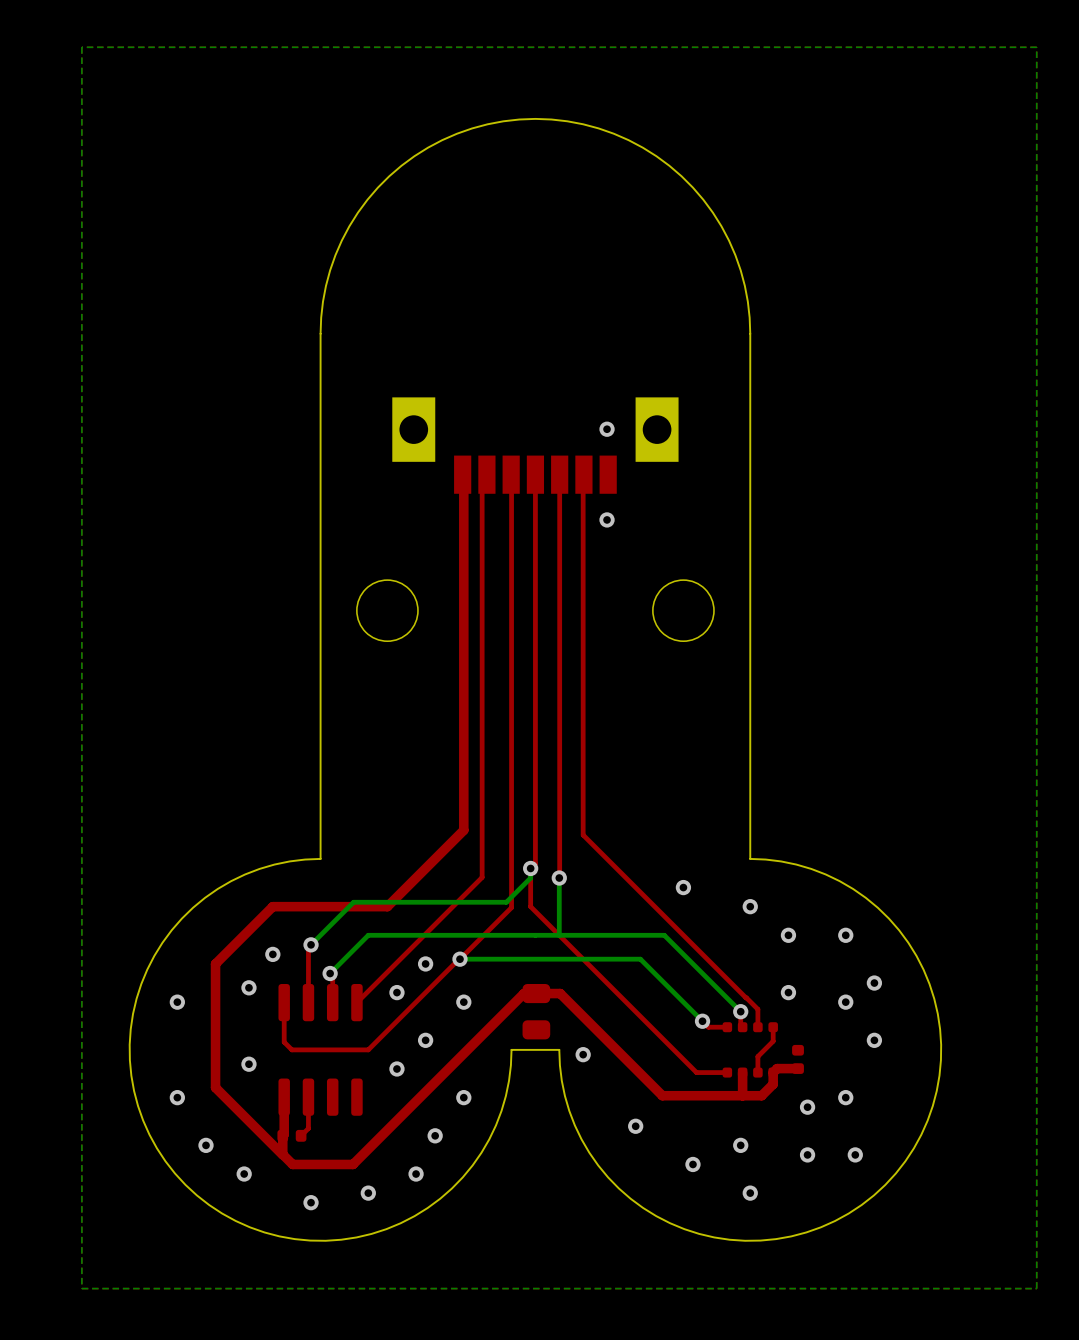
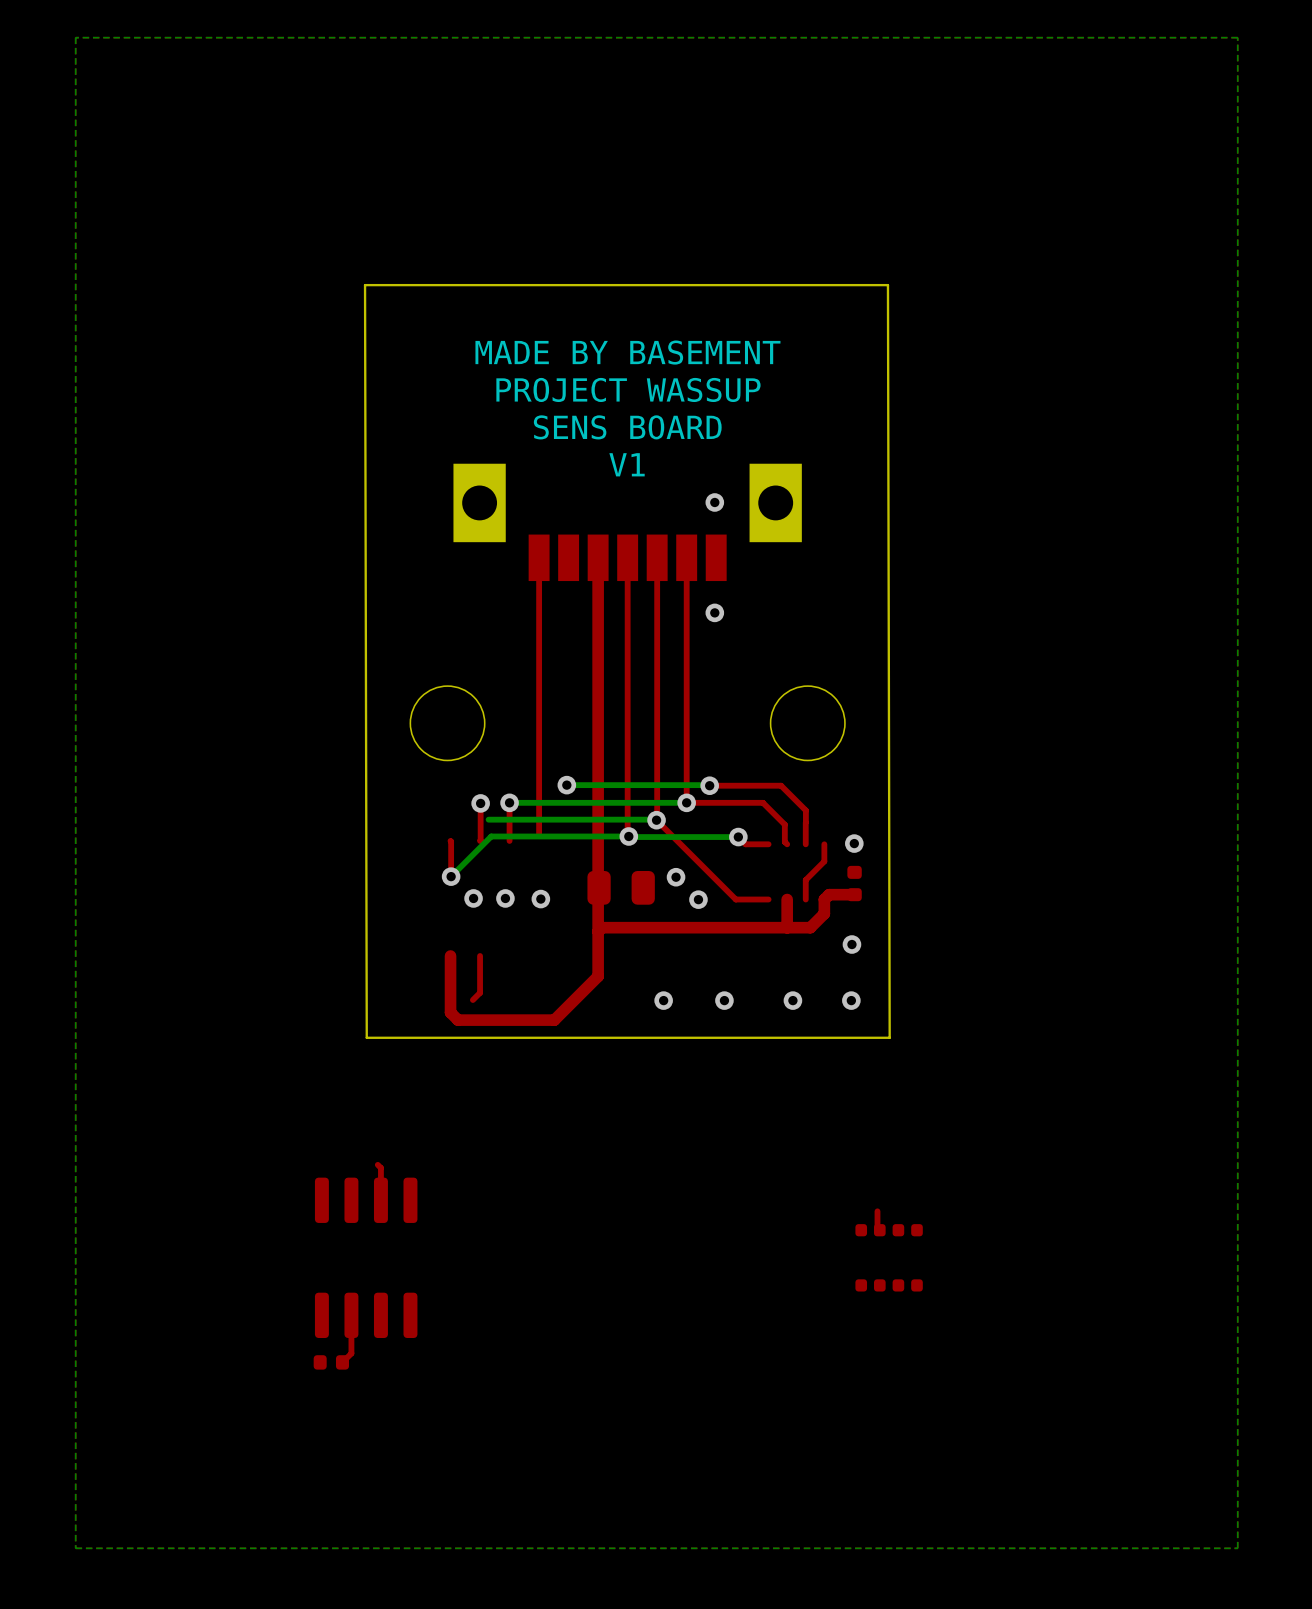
board edge: none -> (887, 285) (365, 285) (366, 1037) (889, 1037) (887, 285)
text: none -> MADE BY BASEMENT (627, 352)
board edge: (750, 333) (750, 858) (796, 864) (839, 881) (865, 897) (888, 918) (916, 955) (934, 998) (941, 1044) (936, 1090) (927, 1120) (913, 1148) (895, 1173) (873, 1195) (848, 1213) (820, 1227) (791, 1236) (760, 1240) (729, 1239) (699, 1233) (670, 1223) (643, 1207) (618, 1188) (598, 1165) (581, 1139) (569, 1110) (561, 1080) (559, 1049) (511, 1049) (509, 1080) (501, 1110) (481, 1152) (451, 1188) (414, 1216) (371, 1233) (325, 1240) (279, 1236) (249, 1227) (222, 1213) (196, 1195) (175, 1173) (149, 1134) (134, 1090) (129, 1060) (130, 1029) (136, 998) (147, 969) (171, 930) (193, 907) (231, 881) (259, 868) (289, 861) (320, 858) (321, 317) (330, 270) (349, 226) (367, 199) (389, 176) (414, 156) (442, 140) (487, 124) (519, 119) (551, 119) (583, 124) (613, 133) (642, 147) (681, 176) (703, 199) (721, 226) (735, 255) (744, 285) (750, 333) -> none
text: none -> PROJECT WASSUP (628, 389)
text: none -> SENS BOARD (627, 427)
text: none -> V1 (627, 464)
top track: none -> (539, 557) (539, 836)
top track: (482, 474) (482, 877) (356, 1002) -> none
top track: (506, 474) (511, 479) (511, 907) (368, 1049) (291, 1049) (284, 1042) (284, 1002) -> none
top track: none -> (598, 557) (598, 976) (554, 1020) (458, 1020) (450, 1012) (450, 955)
top track: none -> (686, 557) (686, 802) (763, 802) (784, 824) (784, 841) (787, 844)
top track: (583, 478) (583, 835) (757, 1009) (757, 1027) -> none
top track: (463, 480) (463, 830) (387, 906) (272, 906) (215, 963) (215, 1087) (282, 1154) -> none
bottom track: none -> (566, 785) (709, 785)
via: none -> (566, 785)
top track: none -> (709, 785) (781, 785) (805, 810) (805, 822)
via: none -> (709, 785)
top track: none -> (480, 803) (480, 840)
via: none -> (480, 803)
top track: none -> (509, 802) (509, 840)
via: none -> (509, 802)
bottom track: none -> (686, 802) (509, 802)
via: none -> (686, 802)
bottom track: none -> (656, 819) (488, 819)
top track: (559, 689) (559, 877) -> (657, 819) (735, 899) (768, 899)
via: none -> (656, 820)
top track: none -> (805, 822) (805, 844)
top track: (535, 702) (535, 863) (530, 868) (530, 906) (696, 1072) (727, 1072) -> none
via: none -> (628, 836)
bottom track: none -> (738, 837) (491, 836) (451, 876)
via: none -> (738, 837)
top track: none -> (450, 840) (451, 876)
via: none -> (854, 843)
via: none -> (451, 876)
via: none -> (676, 877)
top track: none -> (854, 894) (829, 894) (824, 899) (824, 913) (810, 927) (602, 927) (598, 931)
via: none -> (473, 898)
via: none -> (505, 898)
via: none -> (540, 899)
via: none -> (698, 899)
via: none -> (851, 944)
top track: none -> (480, 955) (480, 992) (472, 1000)
via: none -> (663, 1000)
via: none -> (724, 1000)
via: none -> (792, 1000)
via: none -> (851, 1000)
bottom track: (530, 868) (530, 878) (506, 902) (353, 902) (311, 944) -> none
via: (530, 868) -> none
bottom track: (559, 878) (559, 935) -> none
via: (559, 878) -> none
via: (683, 887) -> none
via: (750, 906) -> none
via: (788, 935) -> none
via: (845, 935) -> none
top track: (311, 944) (308, 947) (308, 1002) -> none
via: (311, 944) -> none
via: (272, 954) -> none
bottom track: (459, 959) (640, 959) (702, 1021) -> none
via: (459, 959) -> none
via: (425, 963) -> none
bottom track: (330, 973) (368, 935) (664, 935) (740, 1011) -> none
via: (330, 973) -> none
via: (874, 983) -> none
via: (248, 987) -> none
via: (396, 992) -> none
via: (788, 992) -> none
via: (177, 1002) -> none
via: (463, 1002) -> none
via: (845, 1002) -> none
part rotation: 0° (536, 1011) -> 90° clockwise (621, 887)
part position: (536, 1011) -> (621, 887)
via: (740, 1011) -> none
top track: (702, 1021) (708, 1027) (727, 1027) -> (738, 837) (745, 844) (768, 844)
via: (702, 1021) -> none
top track: (773, 1027) (773, 1041) (757, 1056) (757, 1072) -> (824, 844) (824, 861) (805, 880) (805, 899)
via: (425, 1040) -> none
via: (874, 1040) -> none
via: (583, 1054) -> none
part position: (798, 1059) -> (854, 883)
via: (248, 1064) -> none
via: (396, 1068) -> none
top track: (798, 1068) (777, 1068) (773, 1072) (773, 1084) (761, 1095) (662, 1095) (560, 993) (523, 993) (353, 1164) (292, 1164) (282, 1154) (284, 1097) -> none
top track: (742, 1072) (742, 1095) -> (787, 899) (787, 927)
via: (177, 1097) -> none
via: (463, 1097) -> none
via: (845, 1097) -> none
via: (807, 1107) -> none
via: (635, 1126) -> none
via: (435, 1135) -> none
via: (205, 1145) -> none
via: (740, 1145) -> none
via: (807, 1154) -> none
via: (855, 1154) -> none
via: (692, 1164) -> none
via: (244, 1174) -> none
via: (416, 1174) -> none
via: (368, 1193) -> none
via: (750, 1193) -> none
via: (311, 1202) -> none

